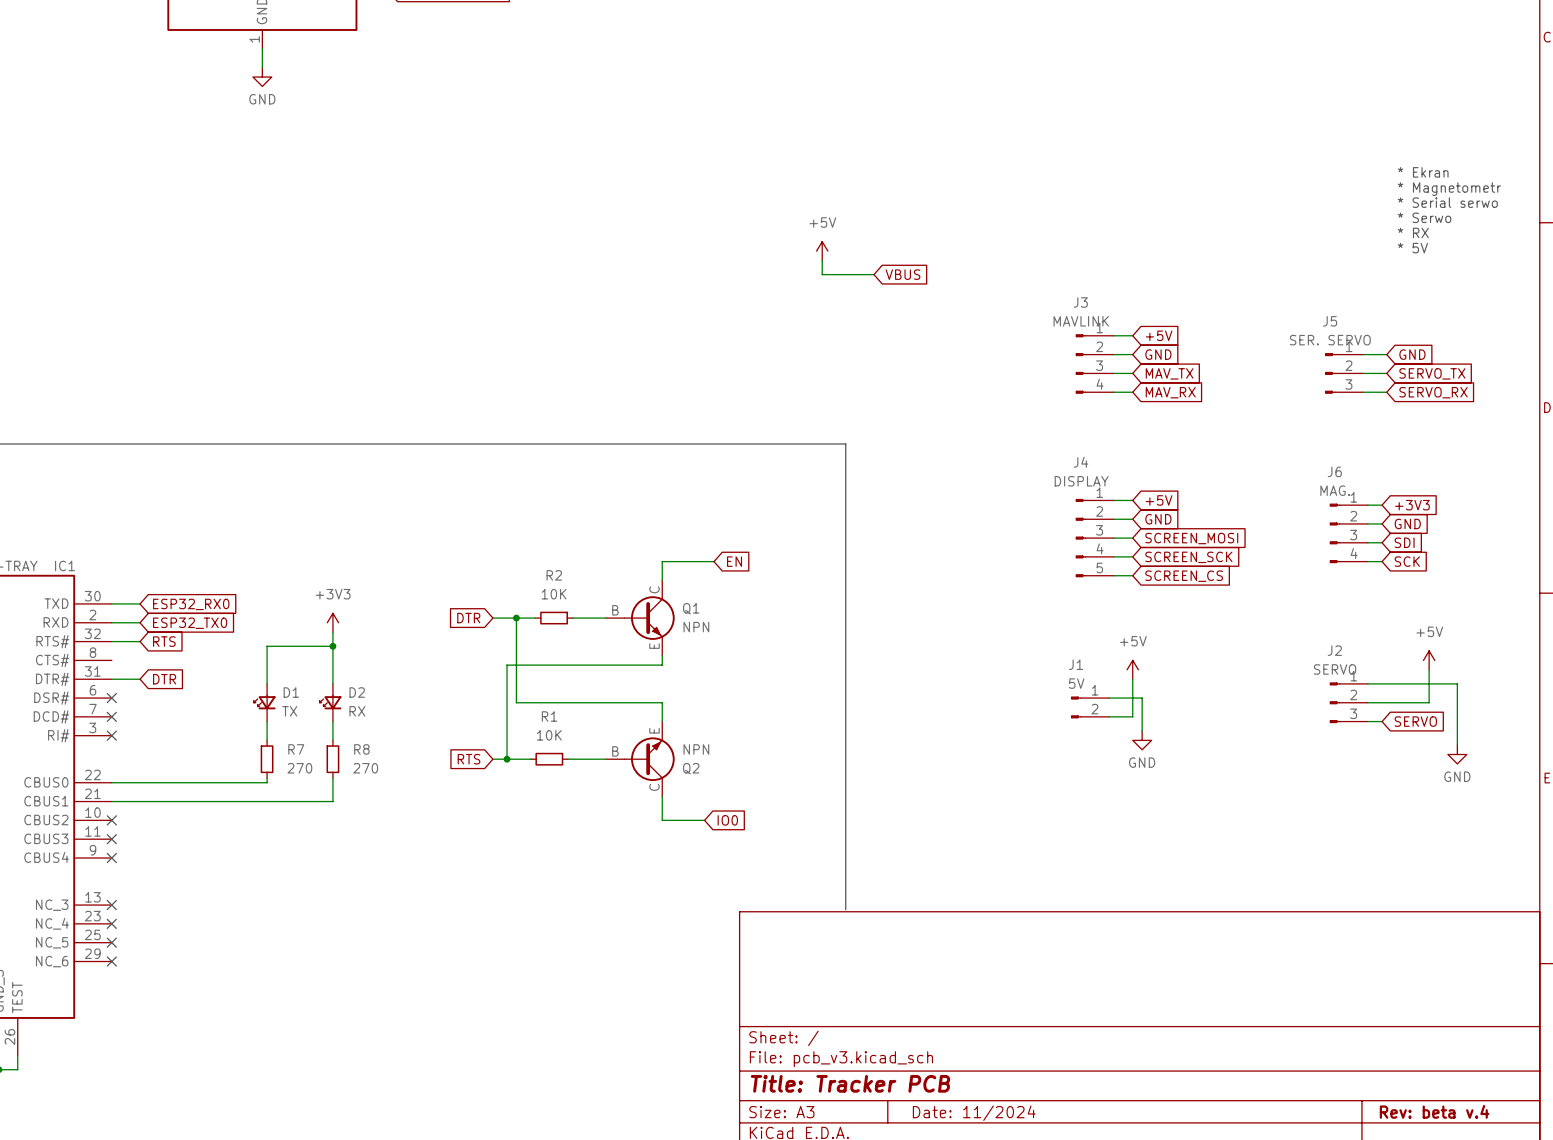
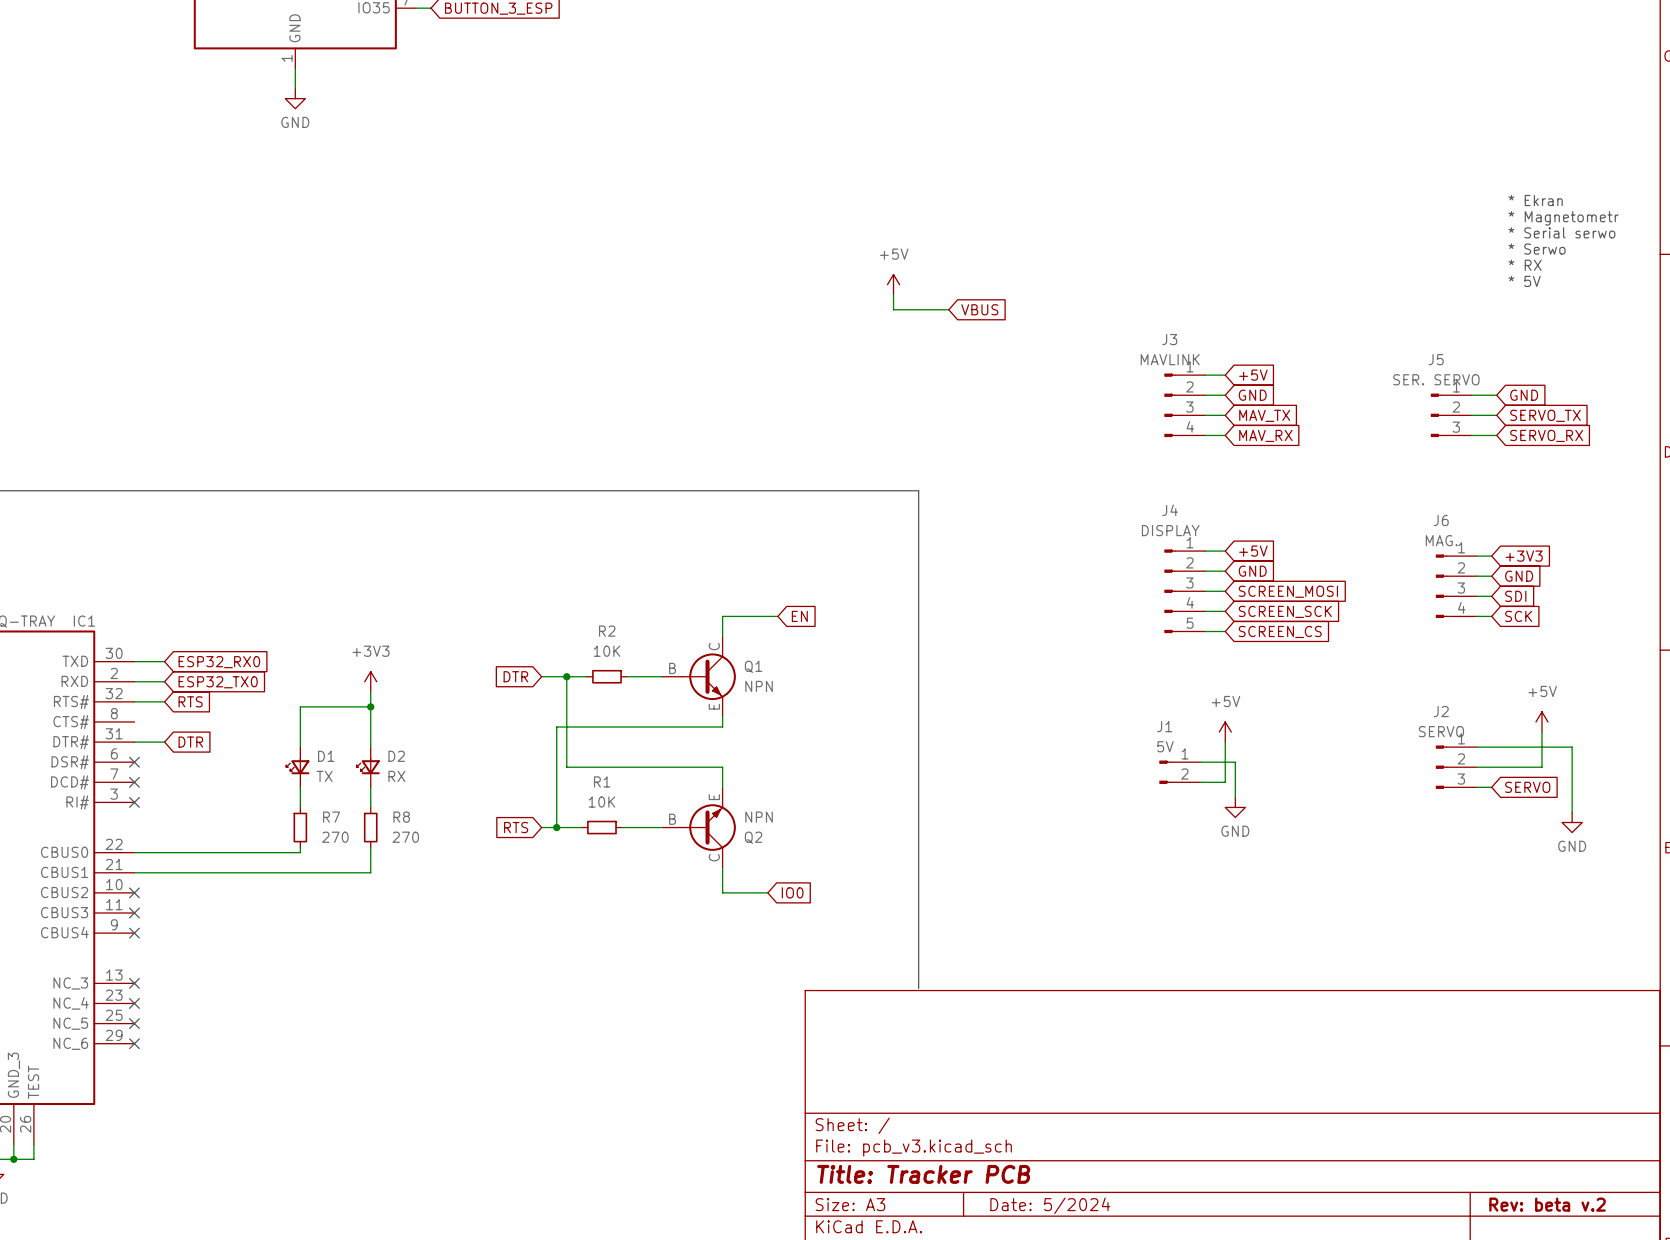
title block: Rev: beta v.4 (1434, 1111) -> Rev: beta v.2 (1547, 1204)
title block: Date: 11/2024 (974, 1113) -> Date: 5/2024 (1050, 1205)

